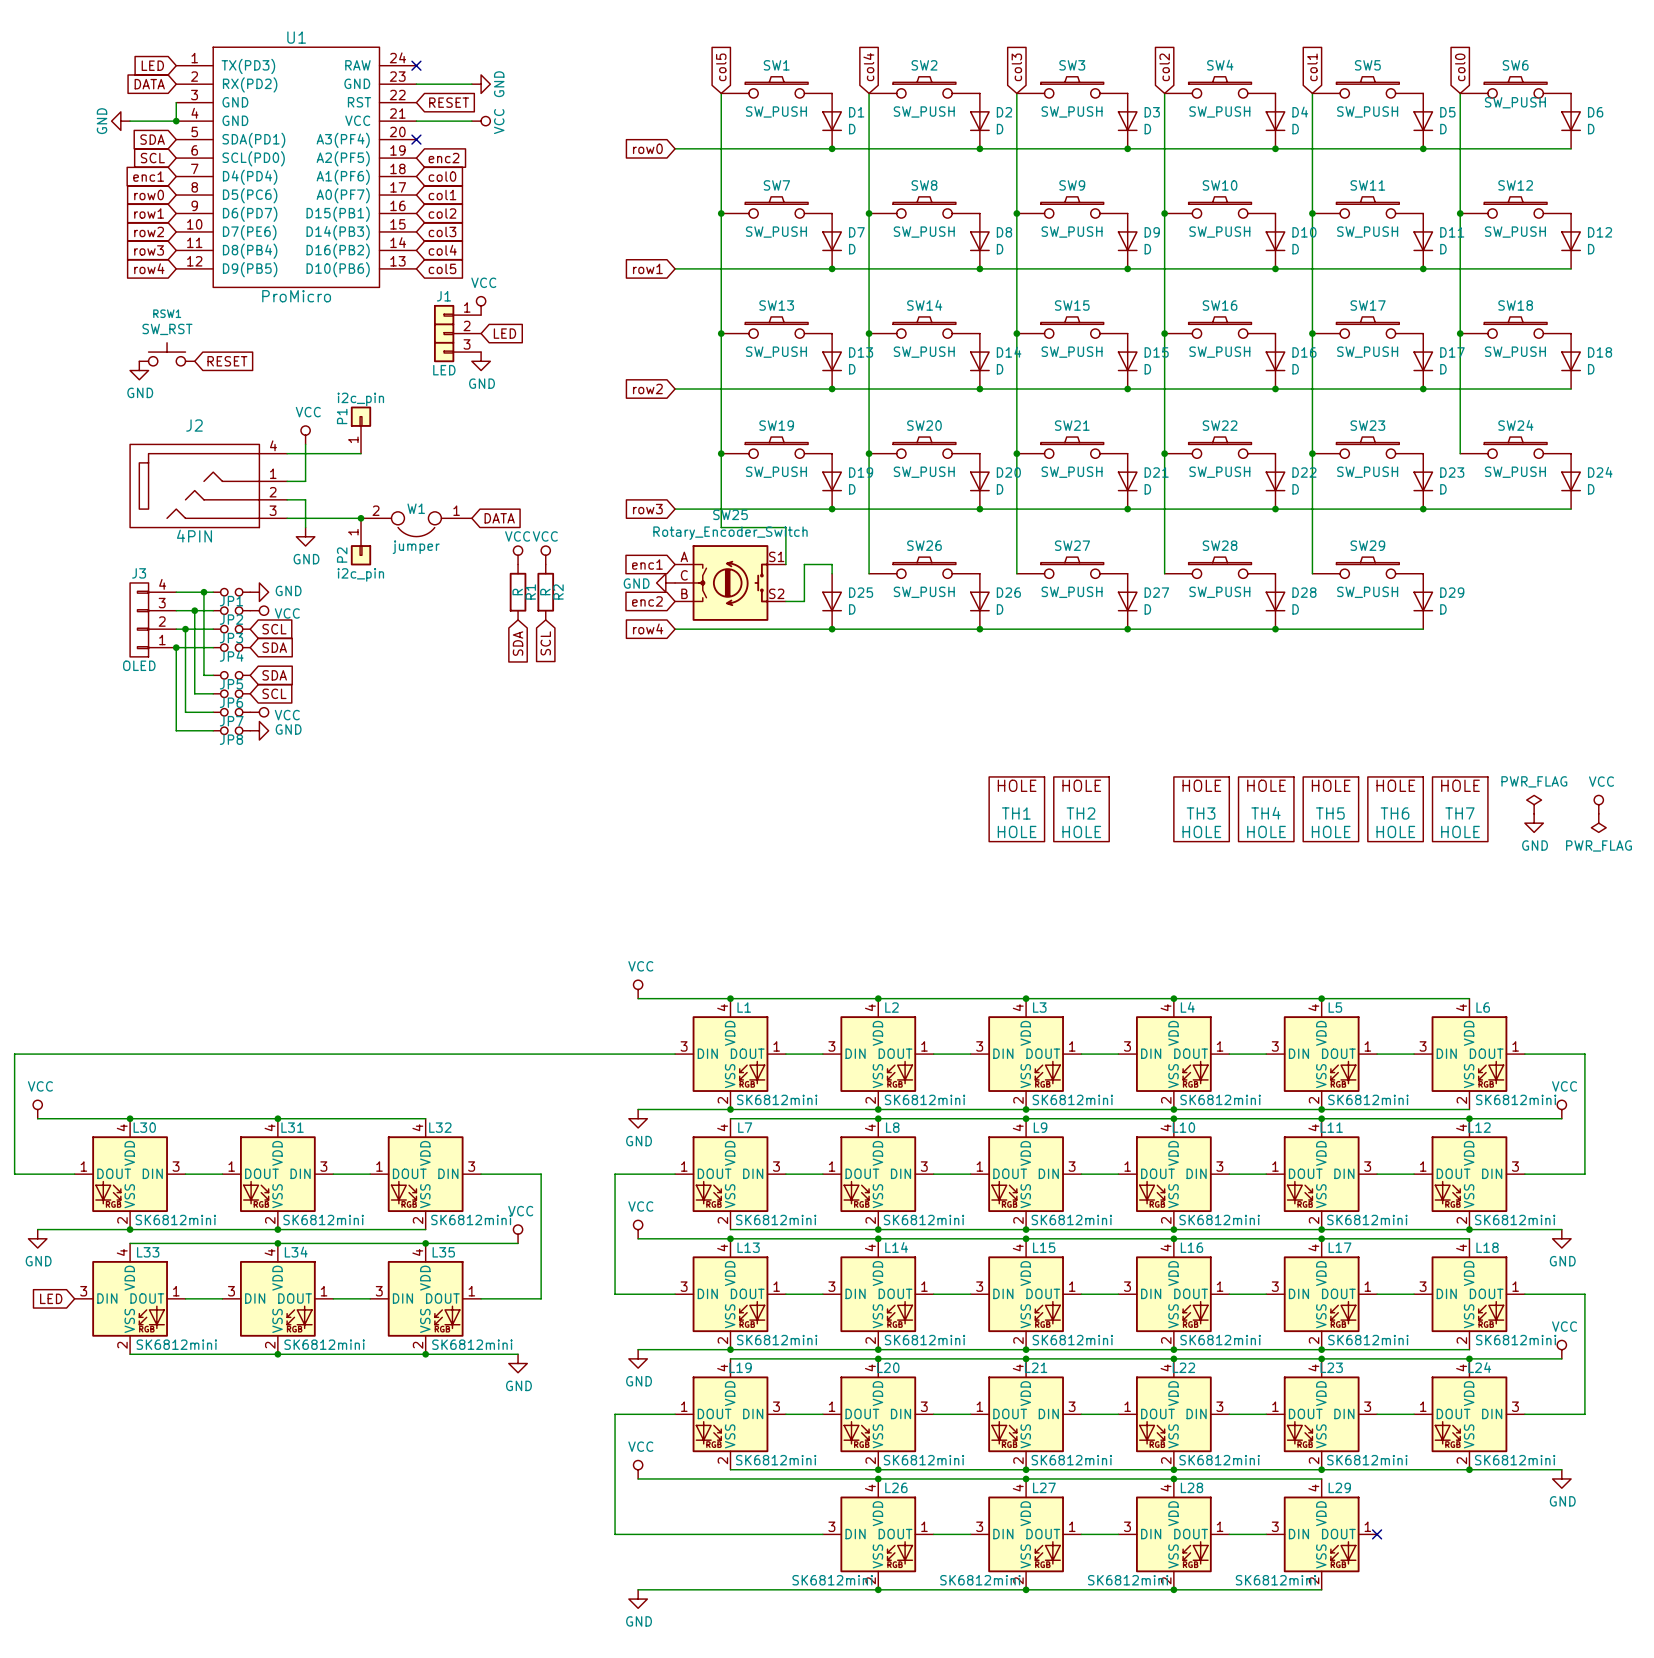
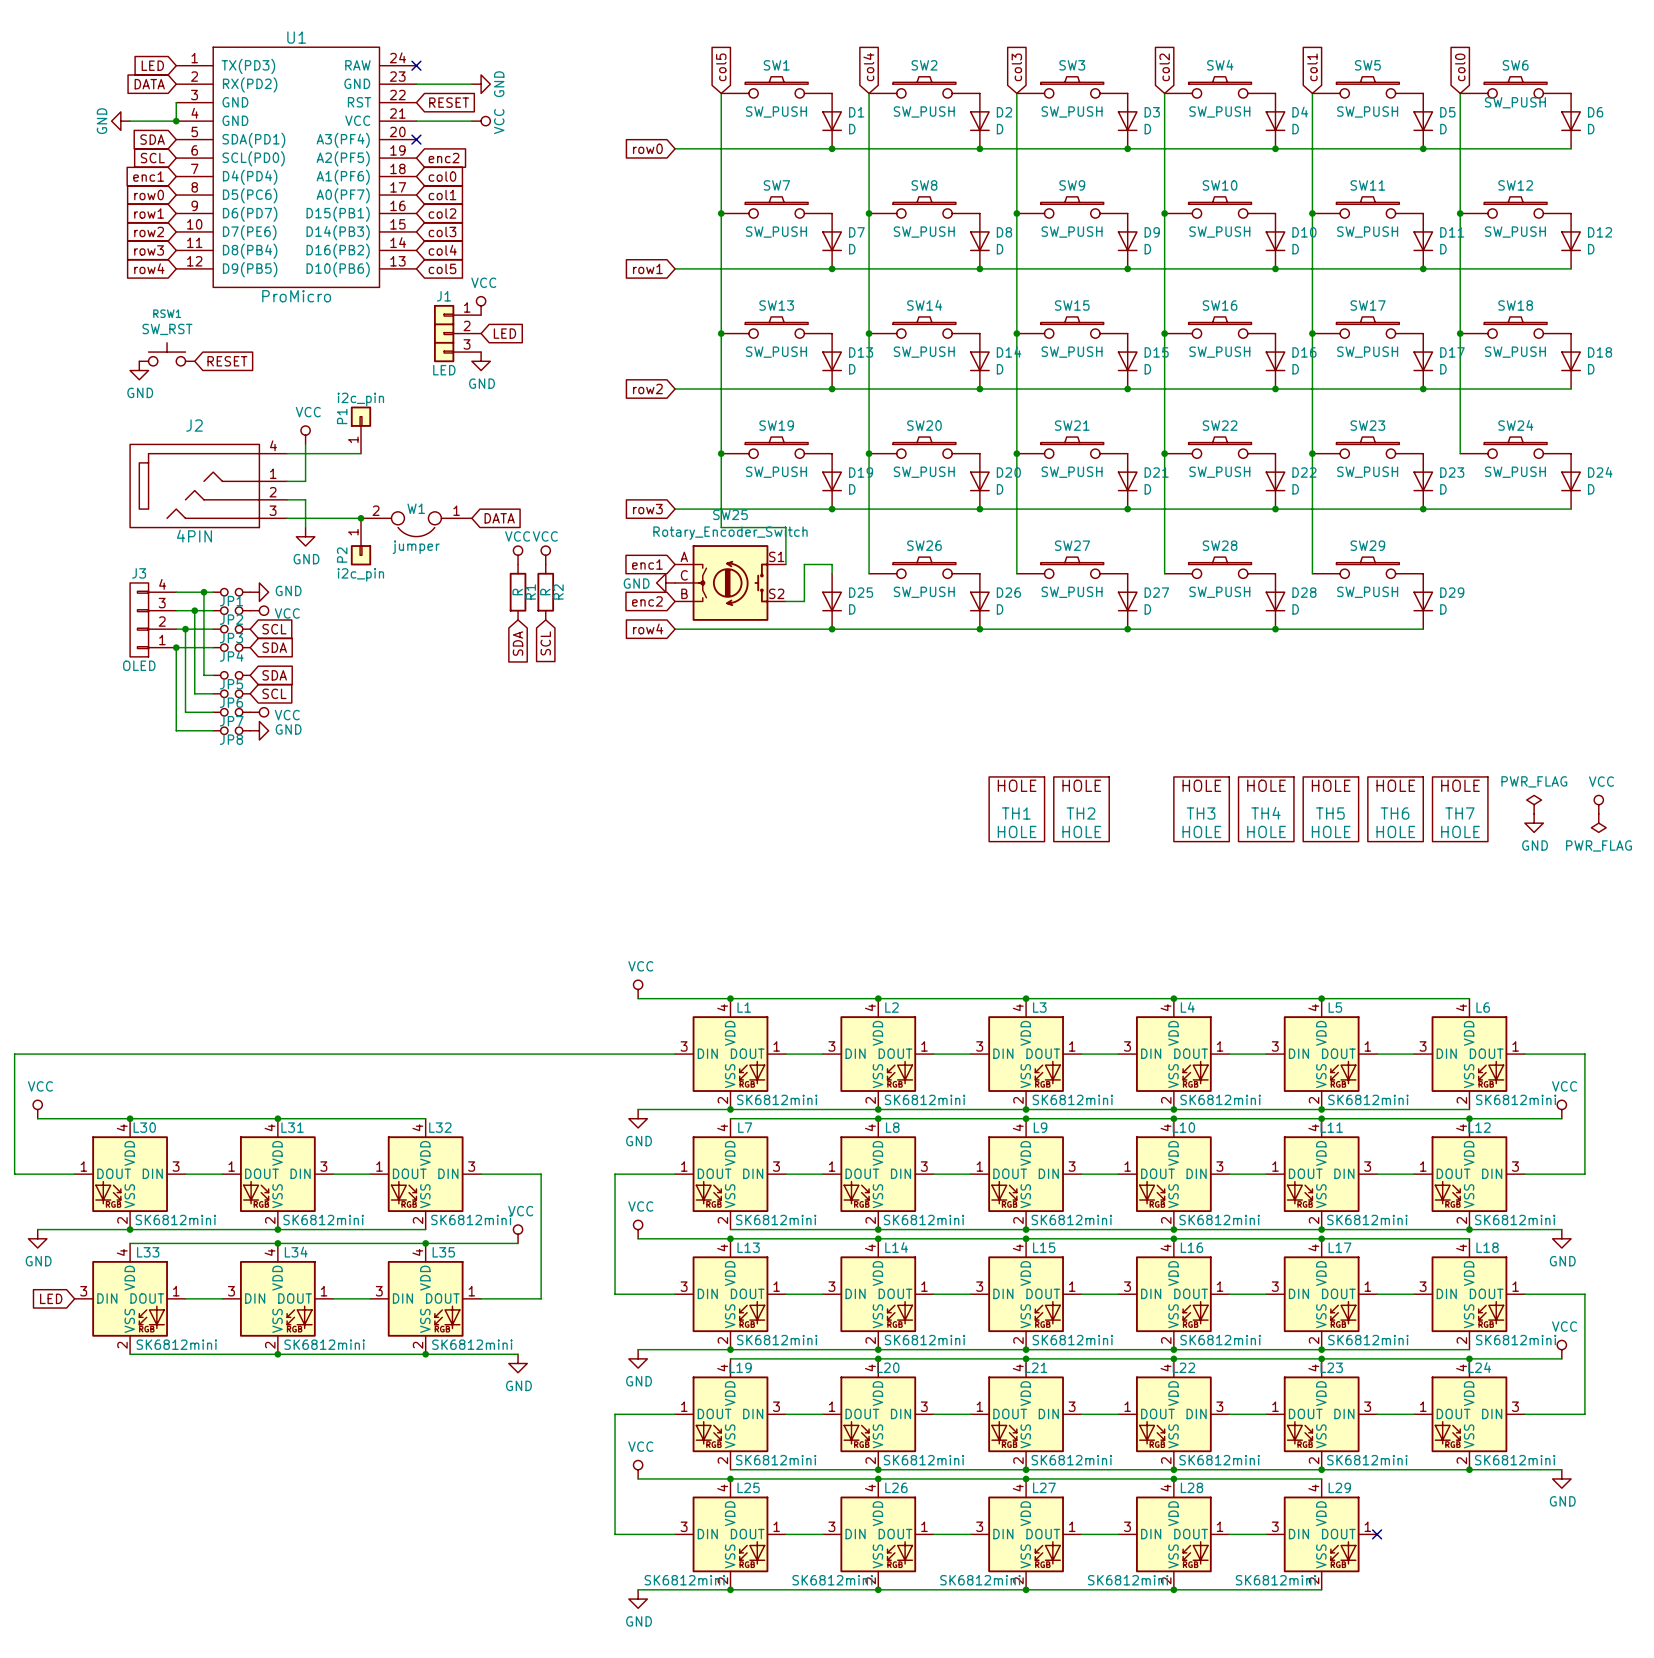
junction: none -> (730, 1478)
L25: none -> SK6812mini (730, 1534)
junction: none -> (730, 1589)

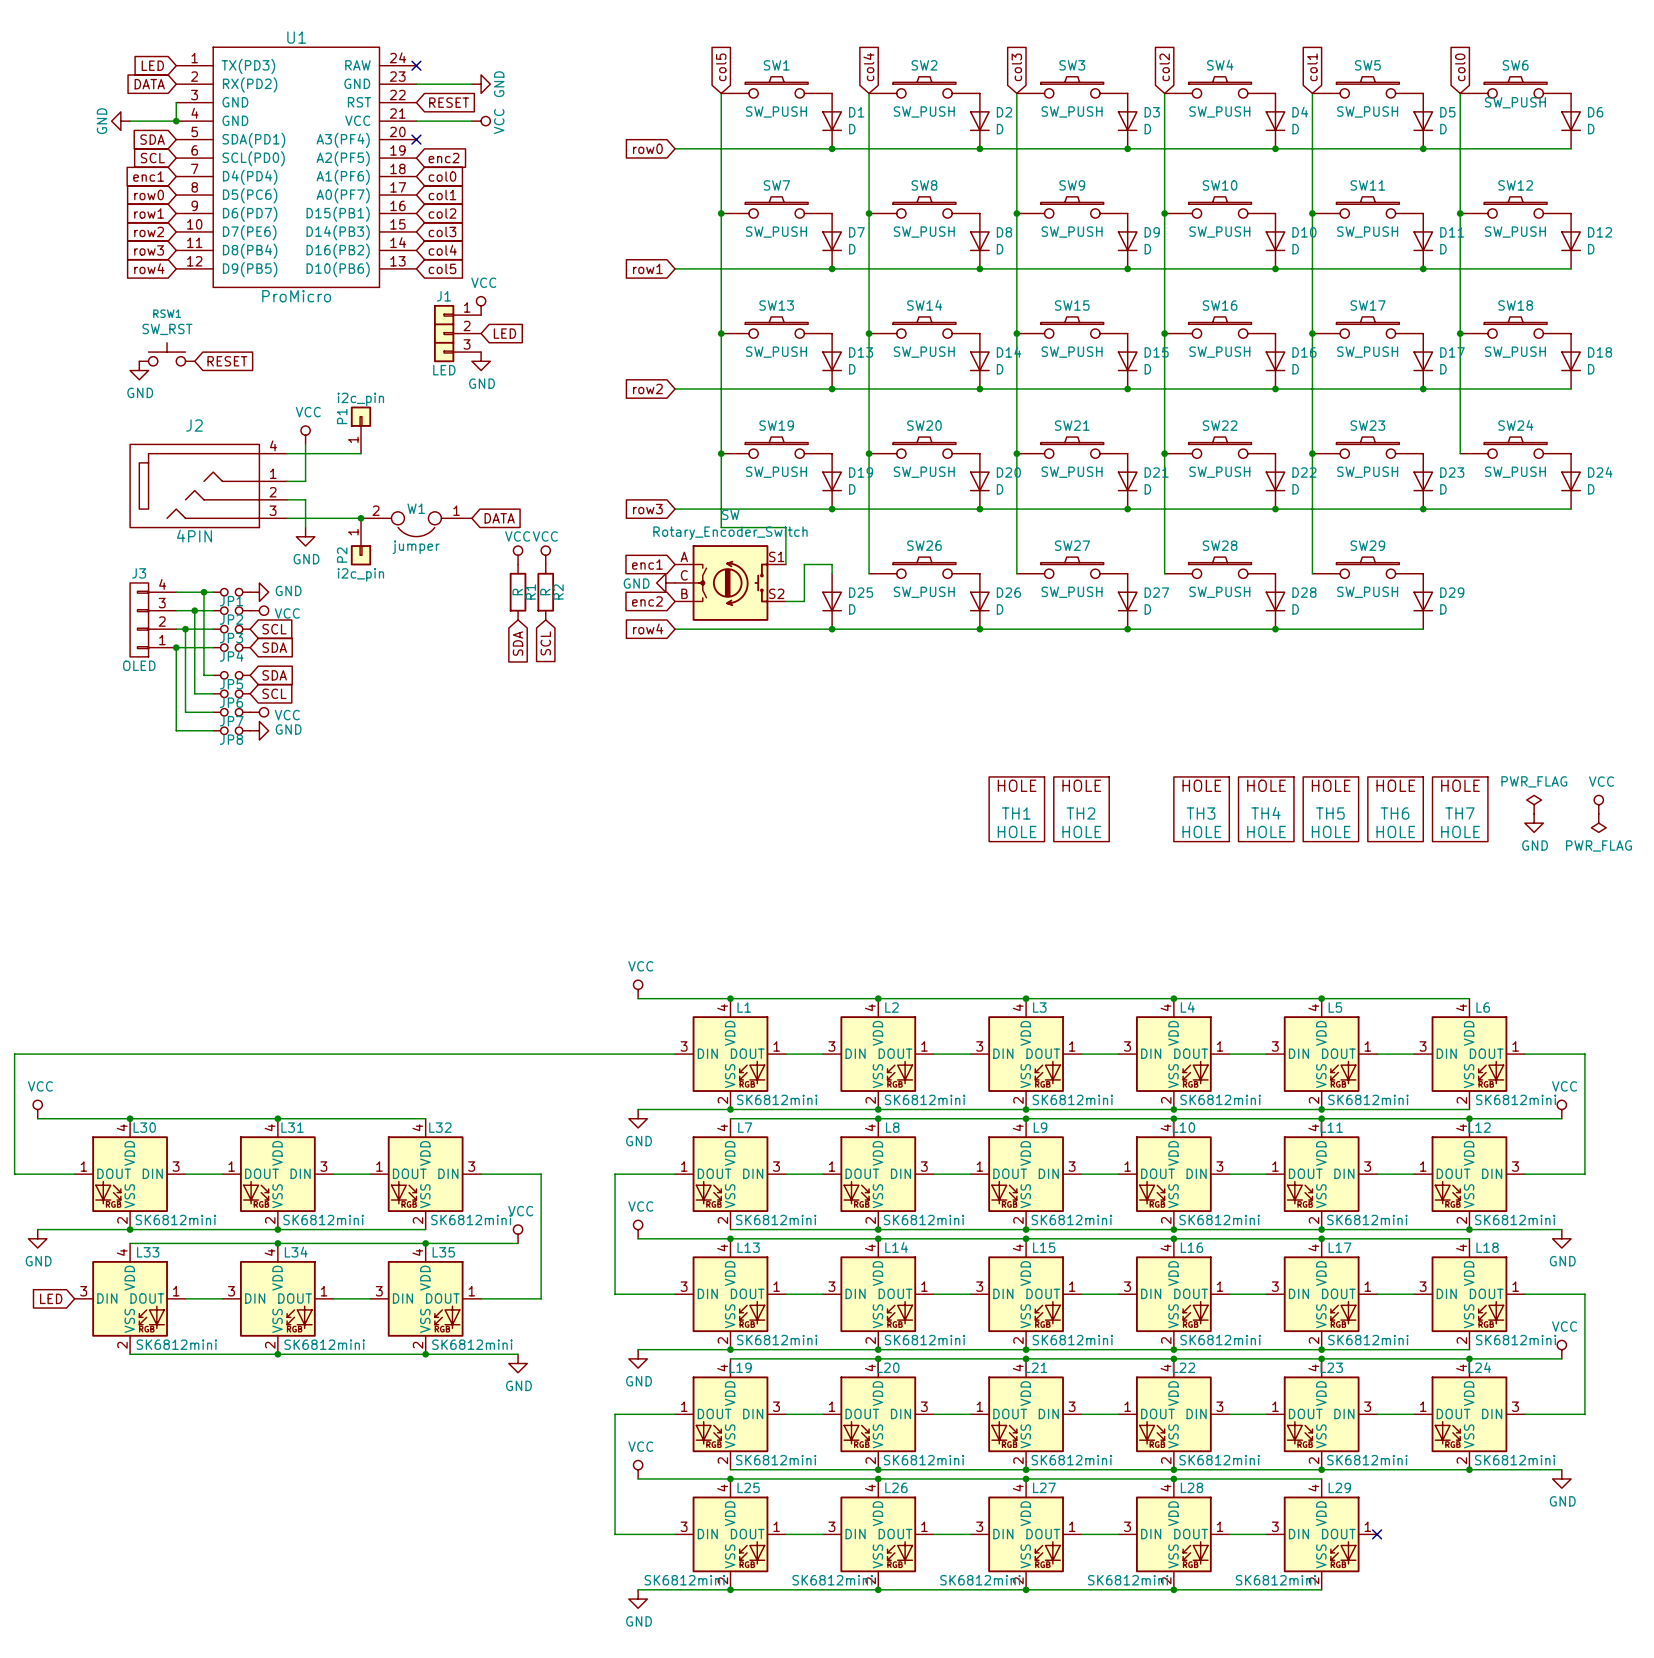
SW25 name: SW25 (730, 514) -> SW (730, 514)

